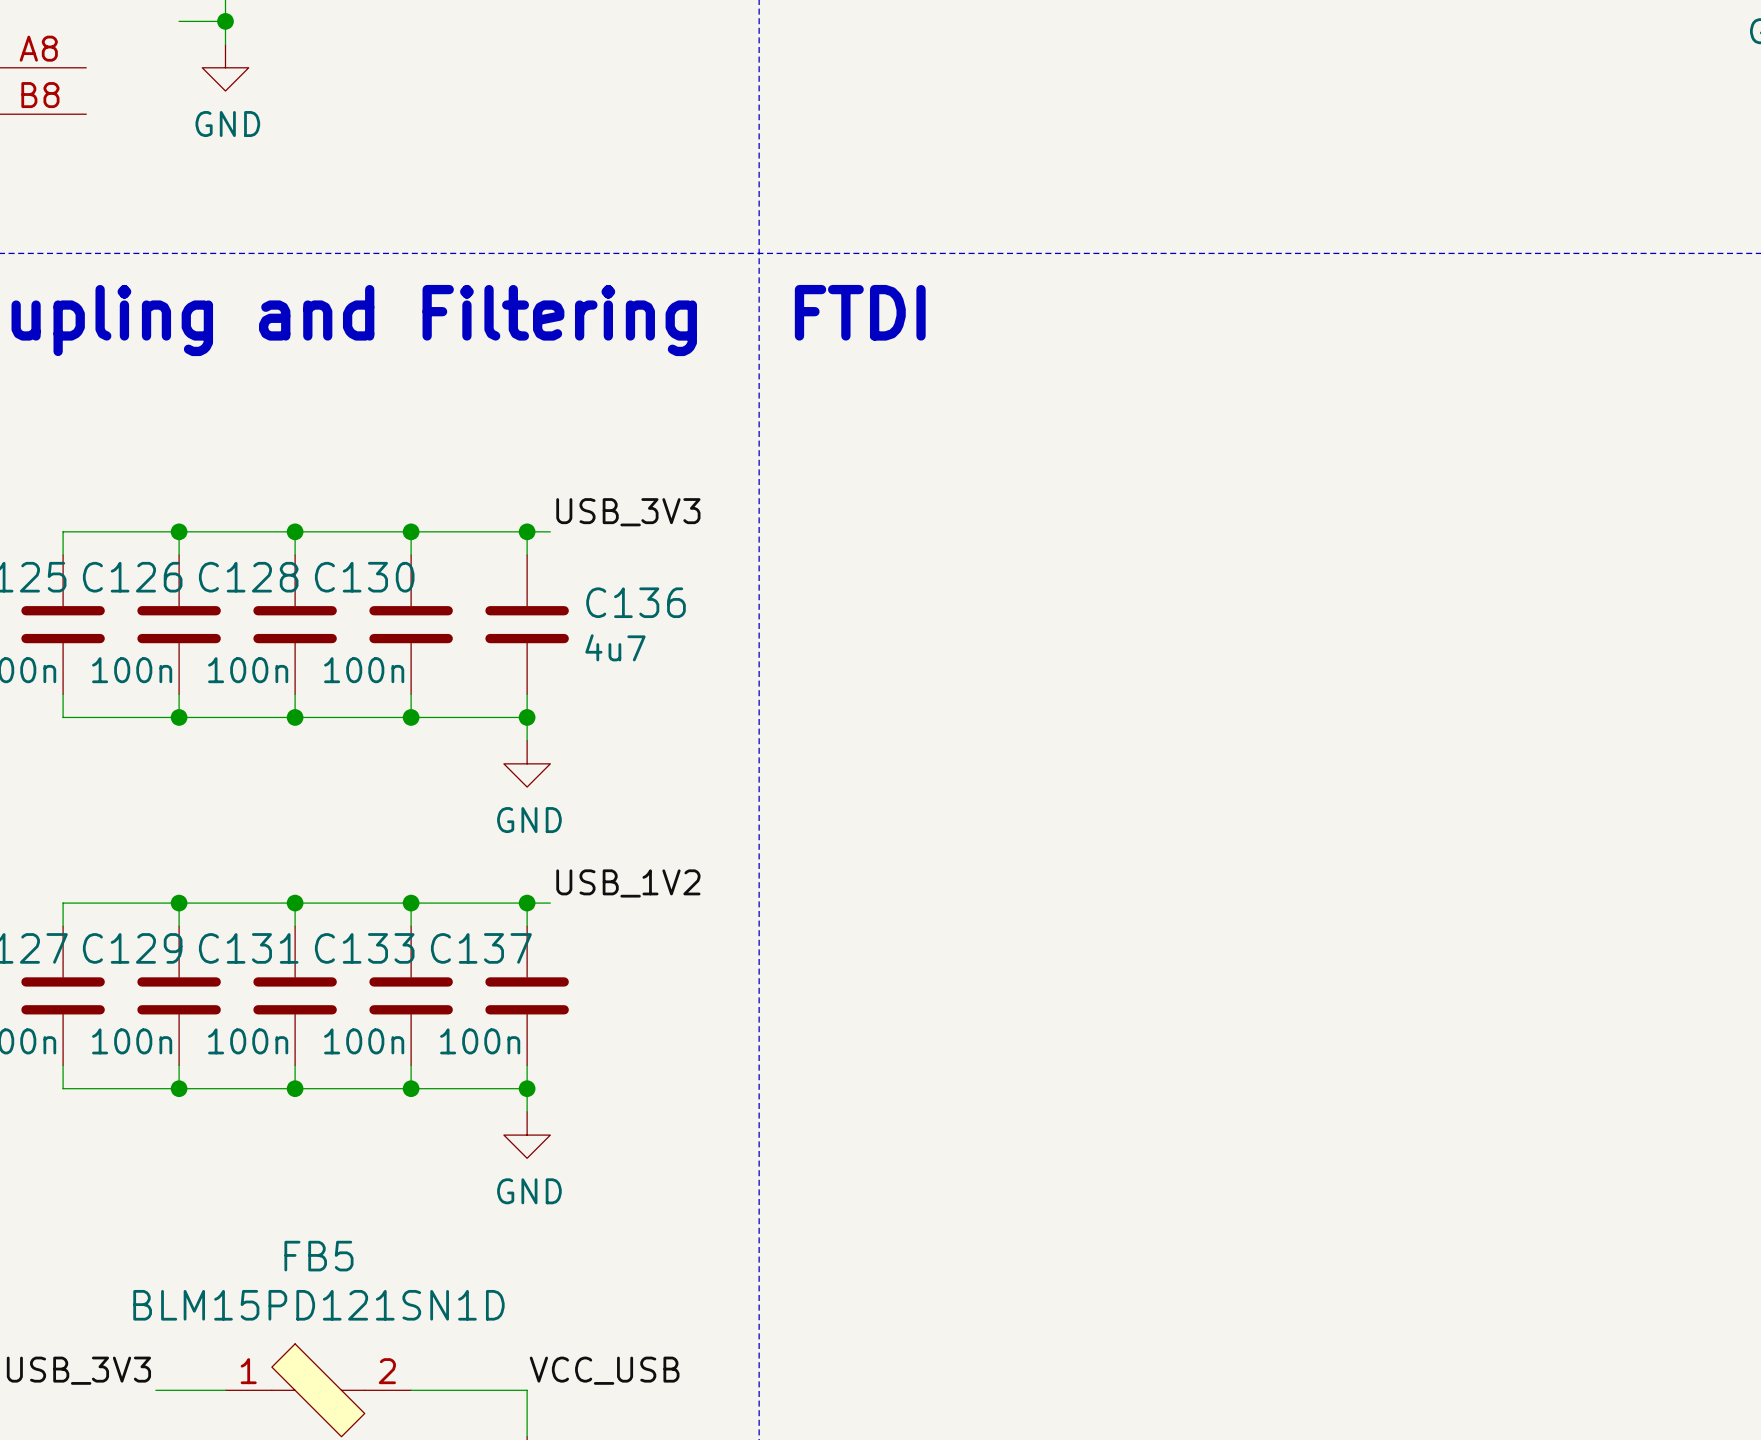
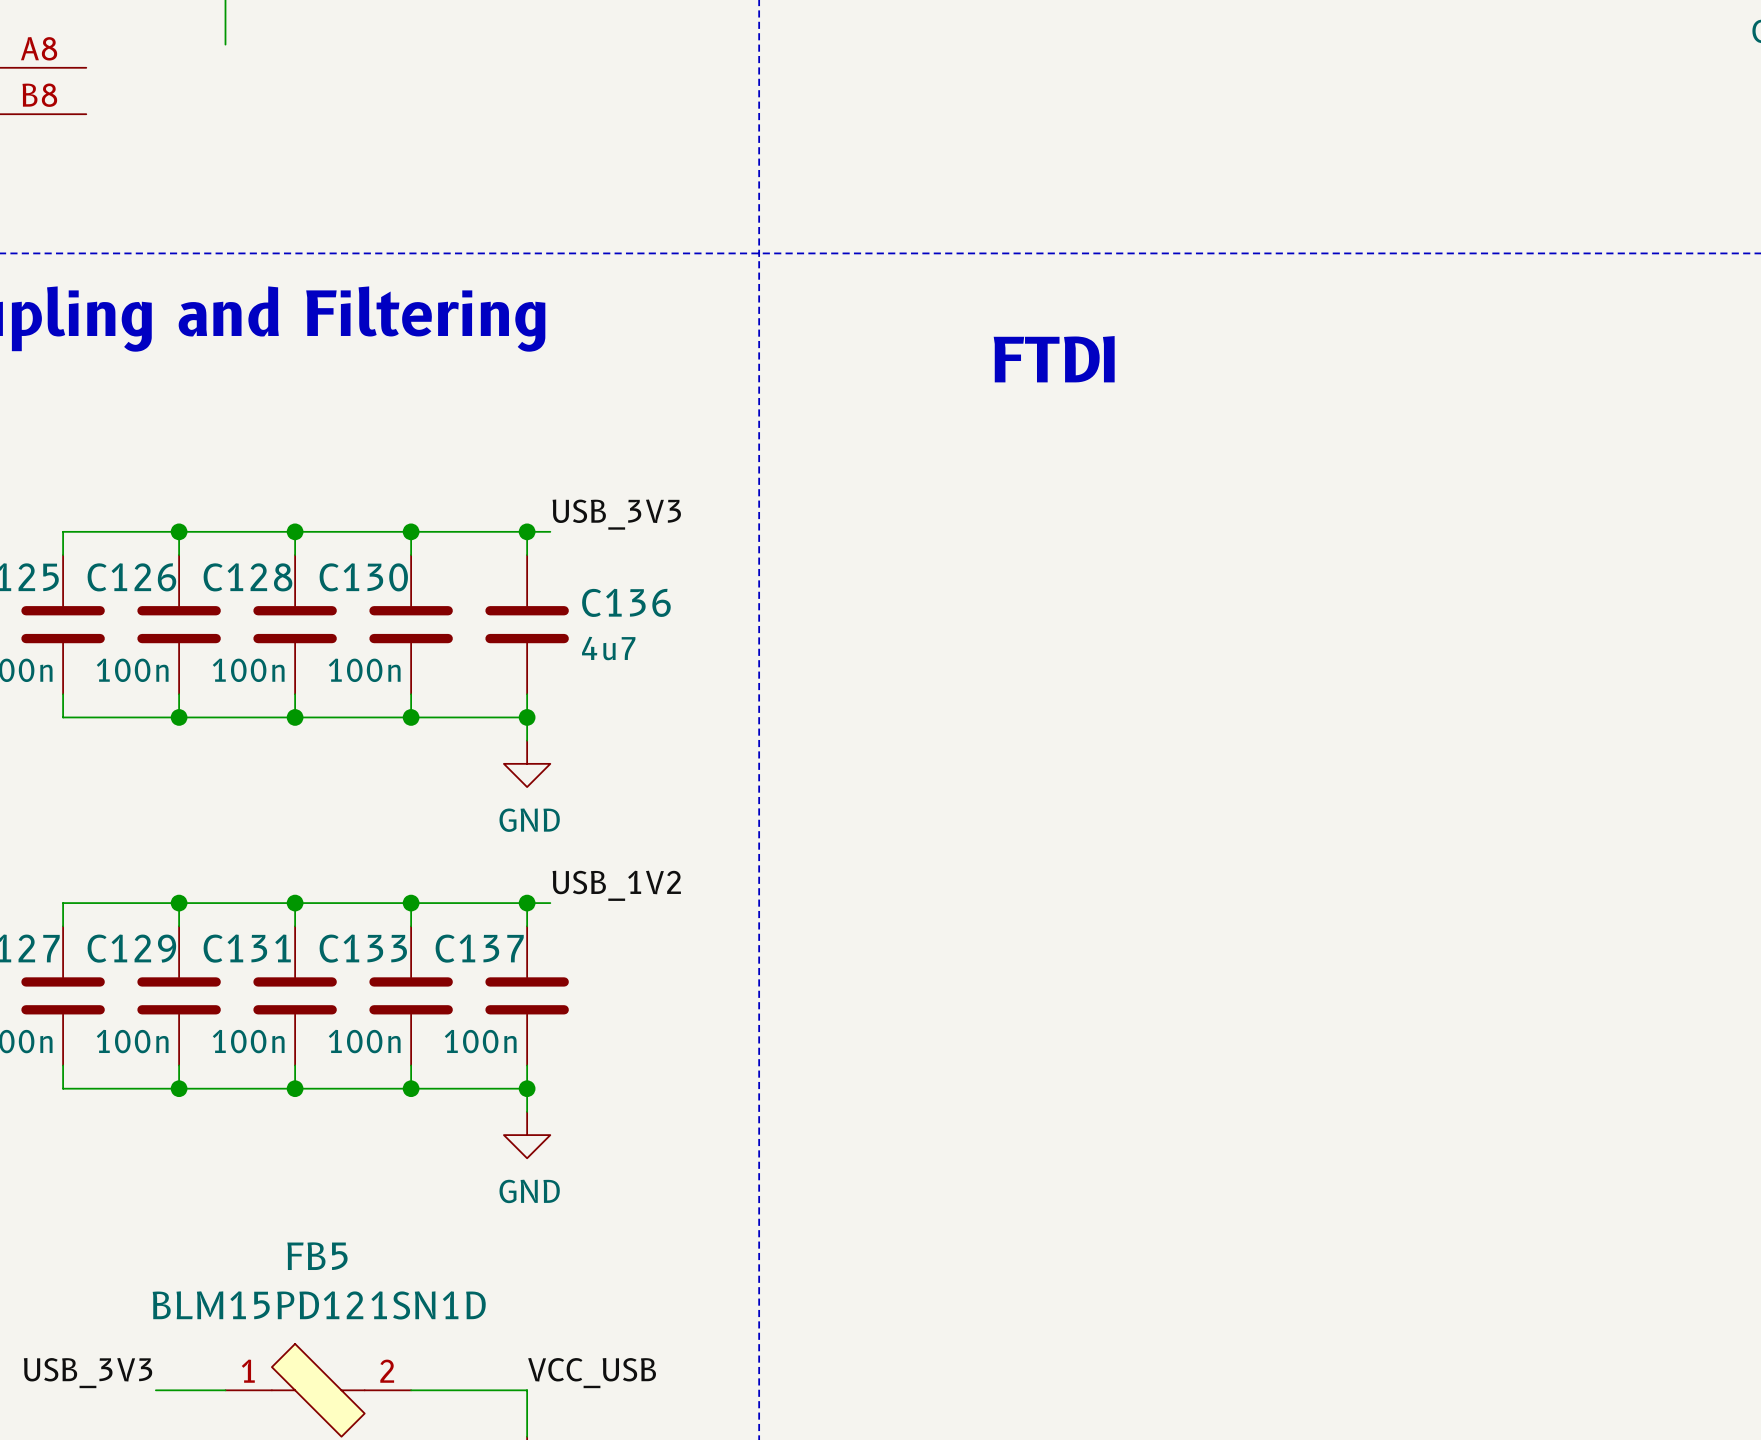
wire: (179, 21) (225, 21) -> none
junction: (225, 21) -> none
power symbol: GND (225, 67) -> none
text position: FTDI (860, 312) -> FTDI (1054, 359)

